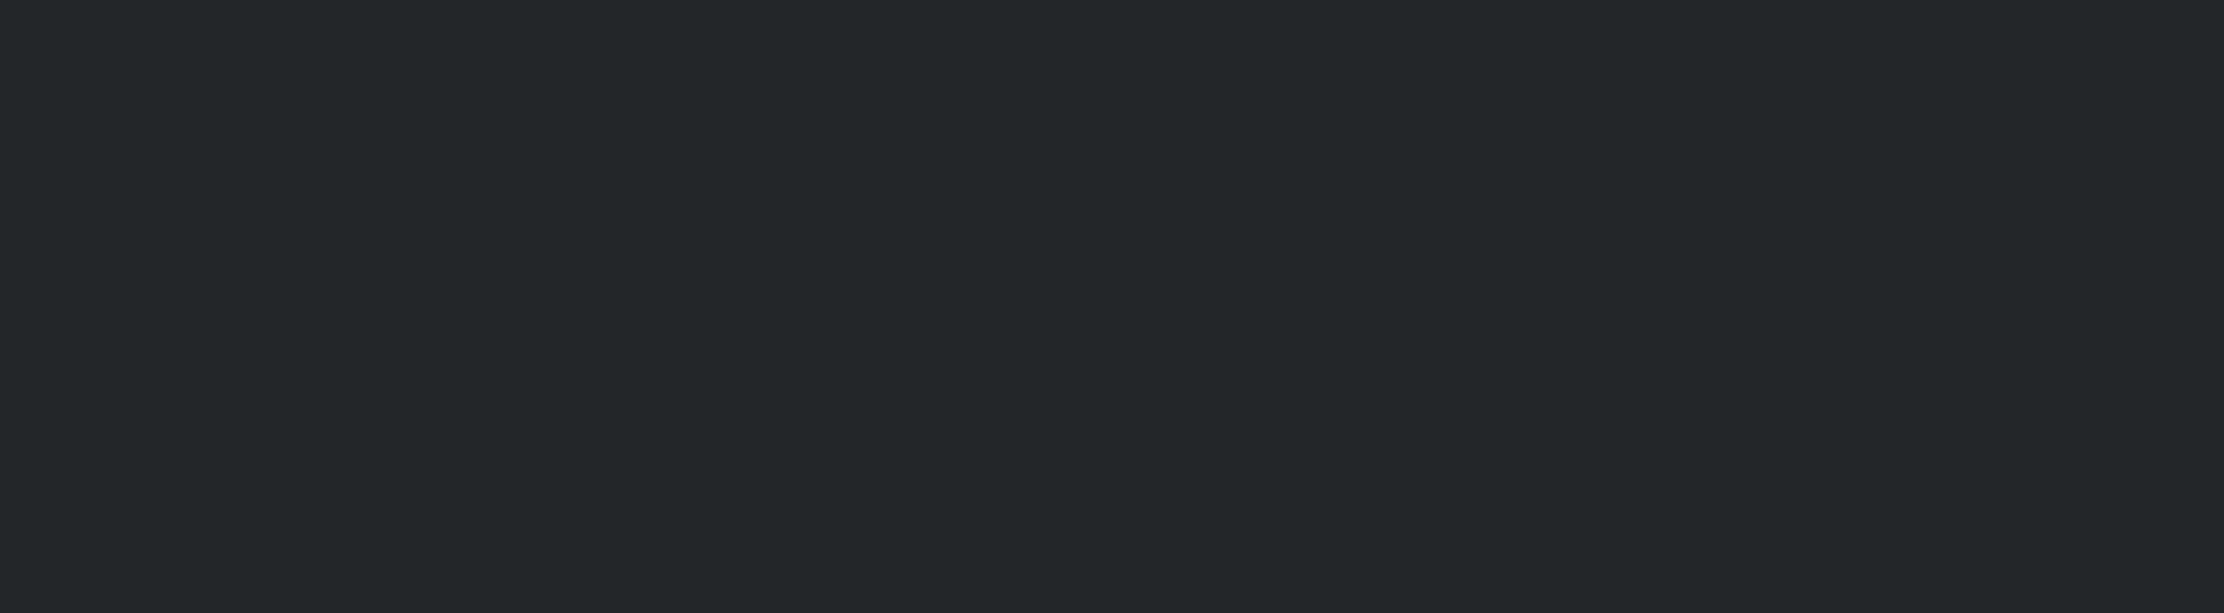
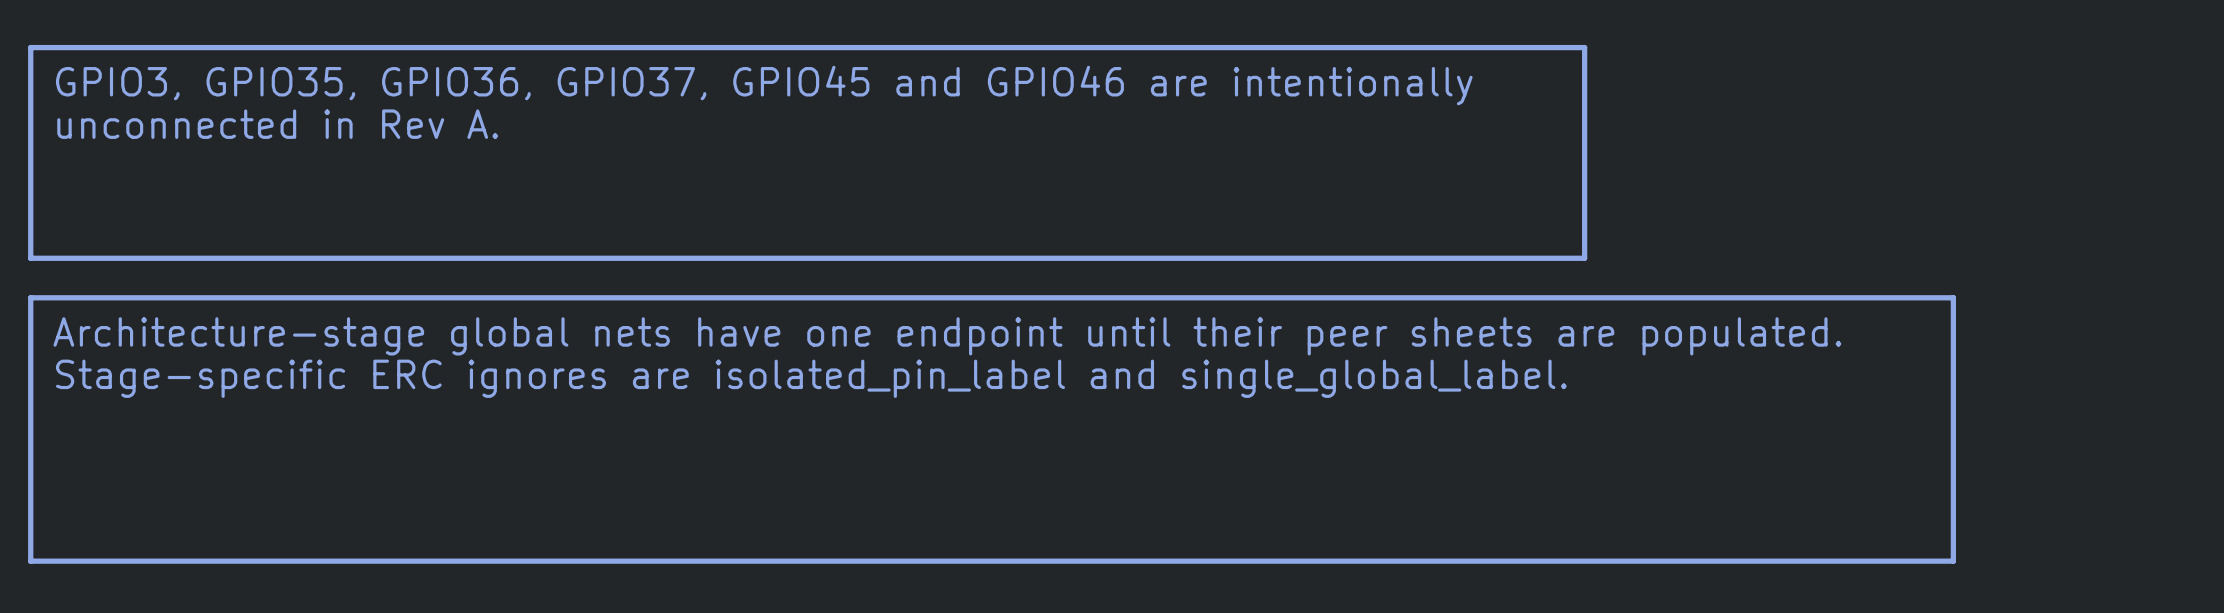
line: none -> (30, 47) (1584, 47) (1584, 258) (30, 258) (30, 47)
text: none -> GPIO3, GPIO35, GPIO36, GPIO37, GPIO45 and GPIO46 are intentionally (764, 85)
text: none -> unconnected in Rev A. (277, 124)
line: none -> (30, 297) (30, 561) (1953, 561) (1953, 297) (30, 297)
text: none -> Architecture-stage global nets have one endpoint until their peer sheets are populated. (947, 336)
text: none -> Stage-specific ERC ignores are isolated_pin_label and single_global_label. (811, 378)

